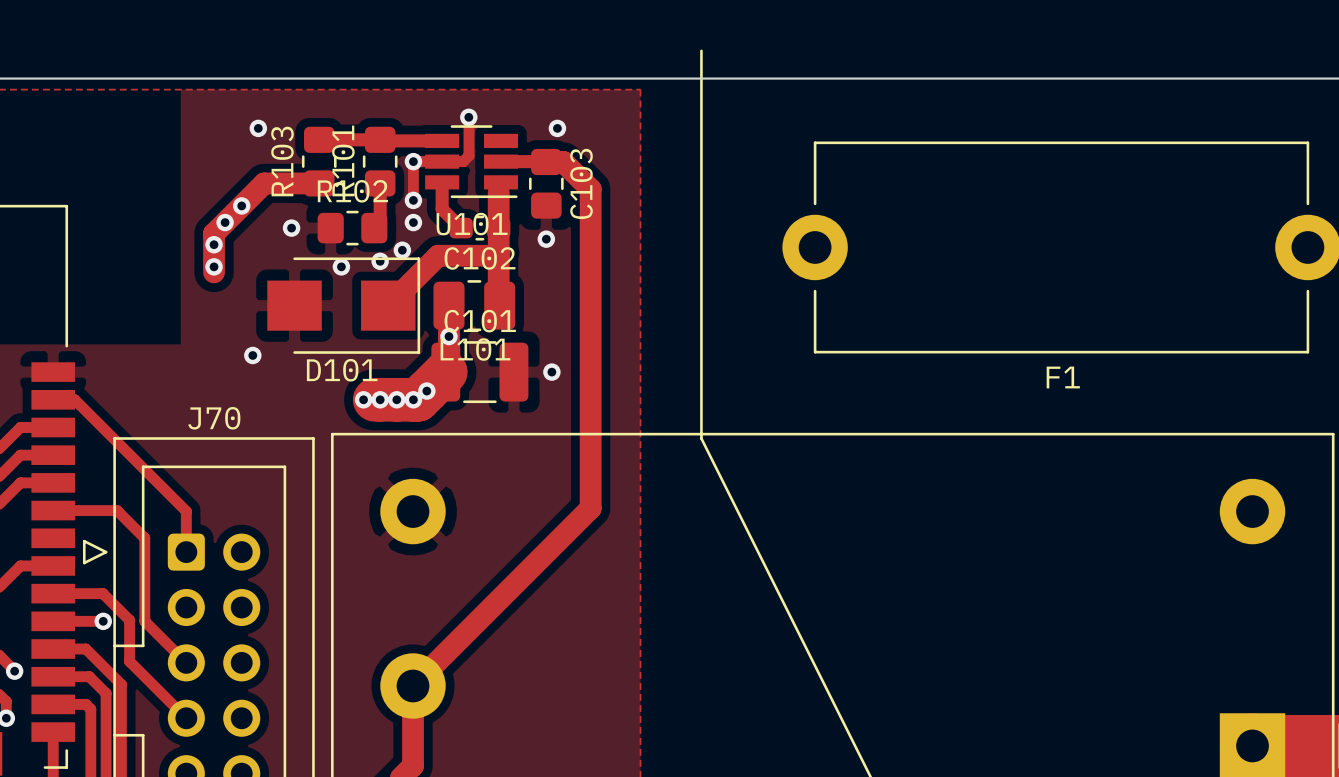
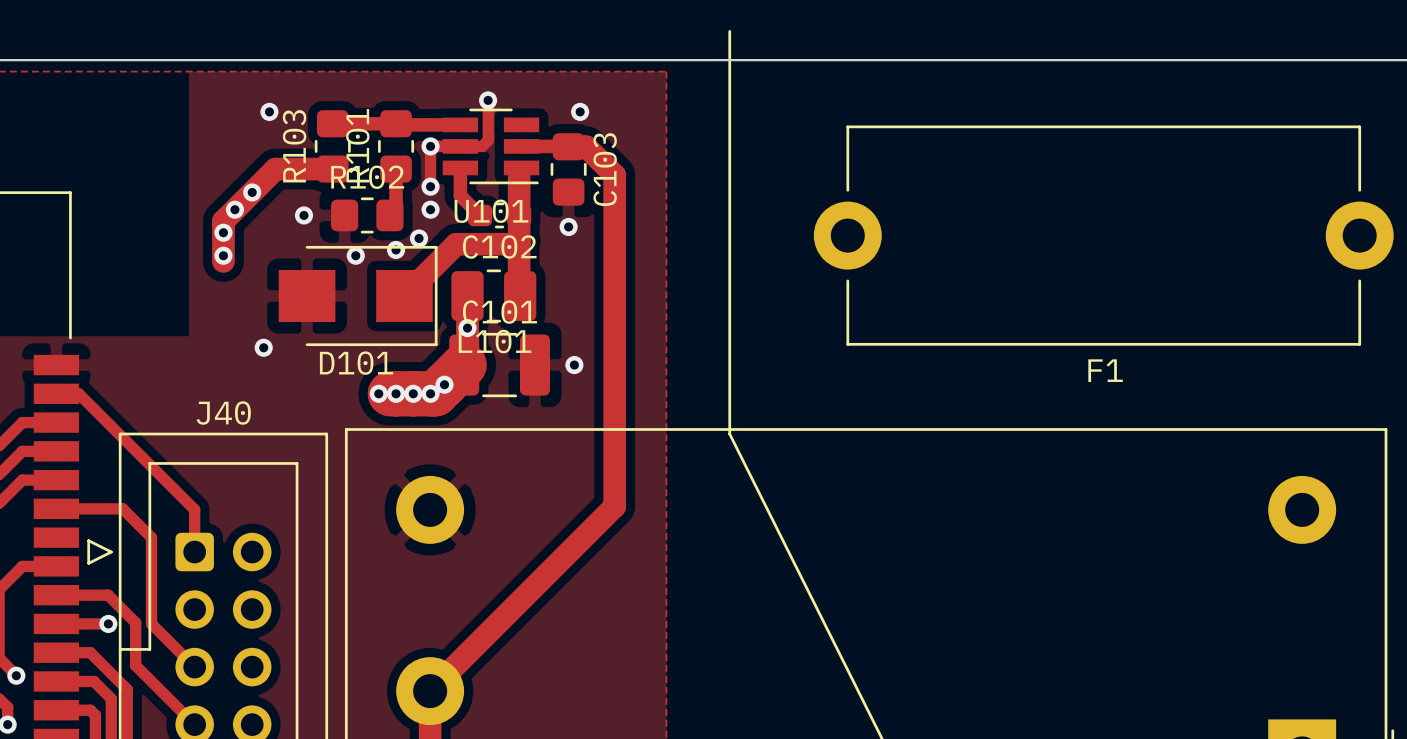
J70 name: J70 (214, 418) -> J40 (223, 413)

